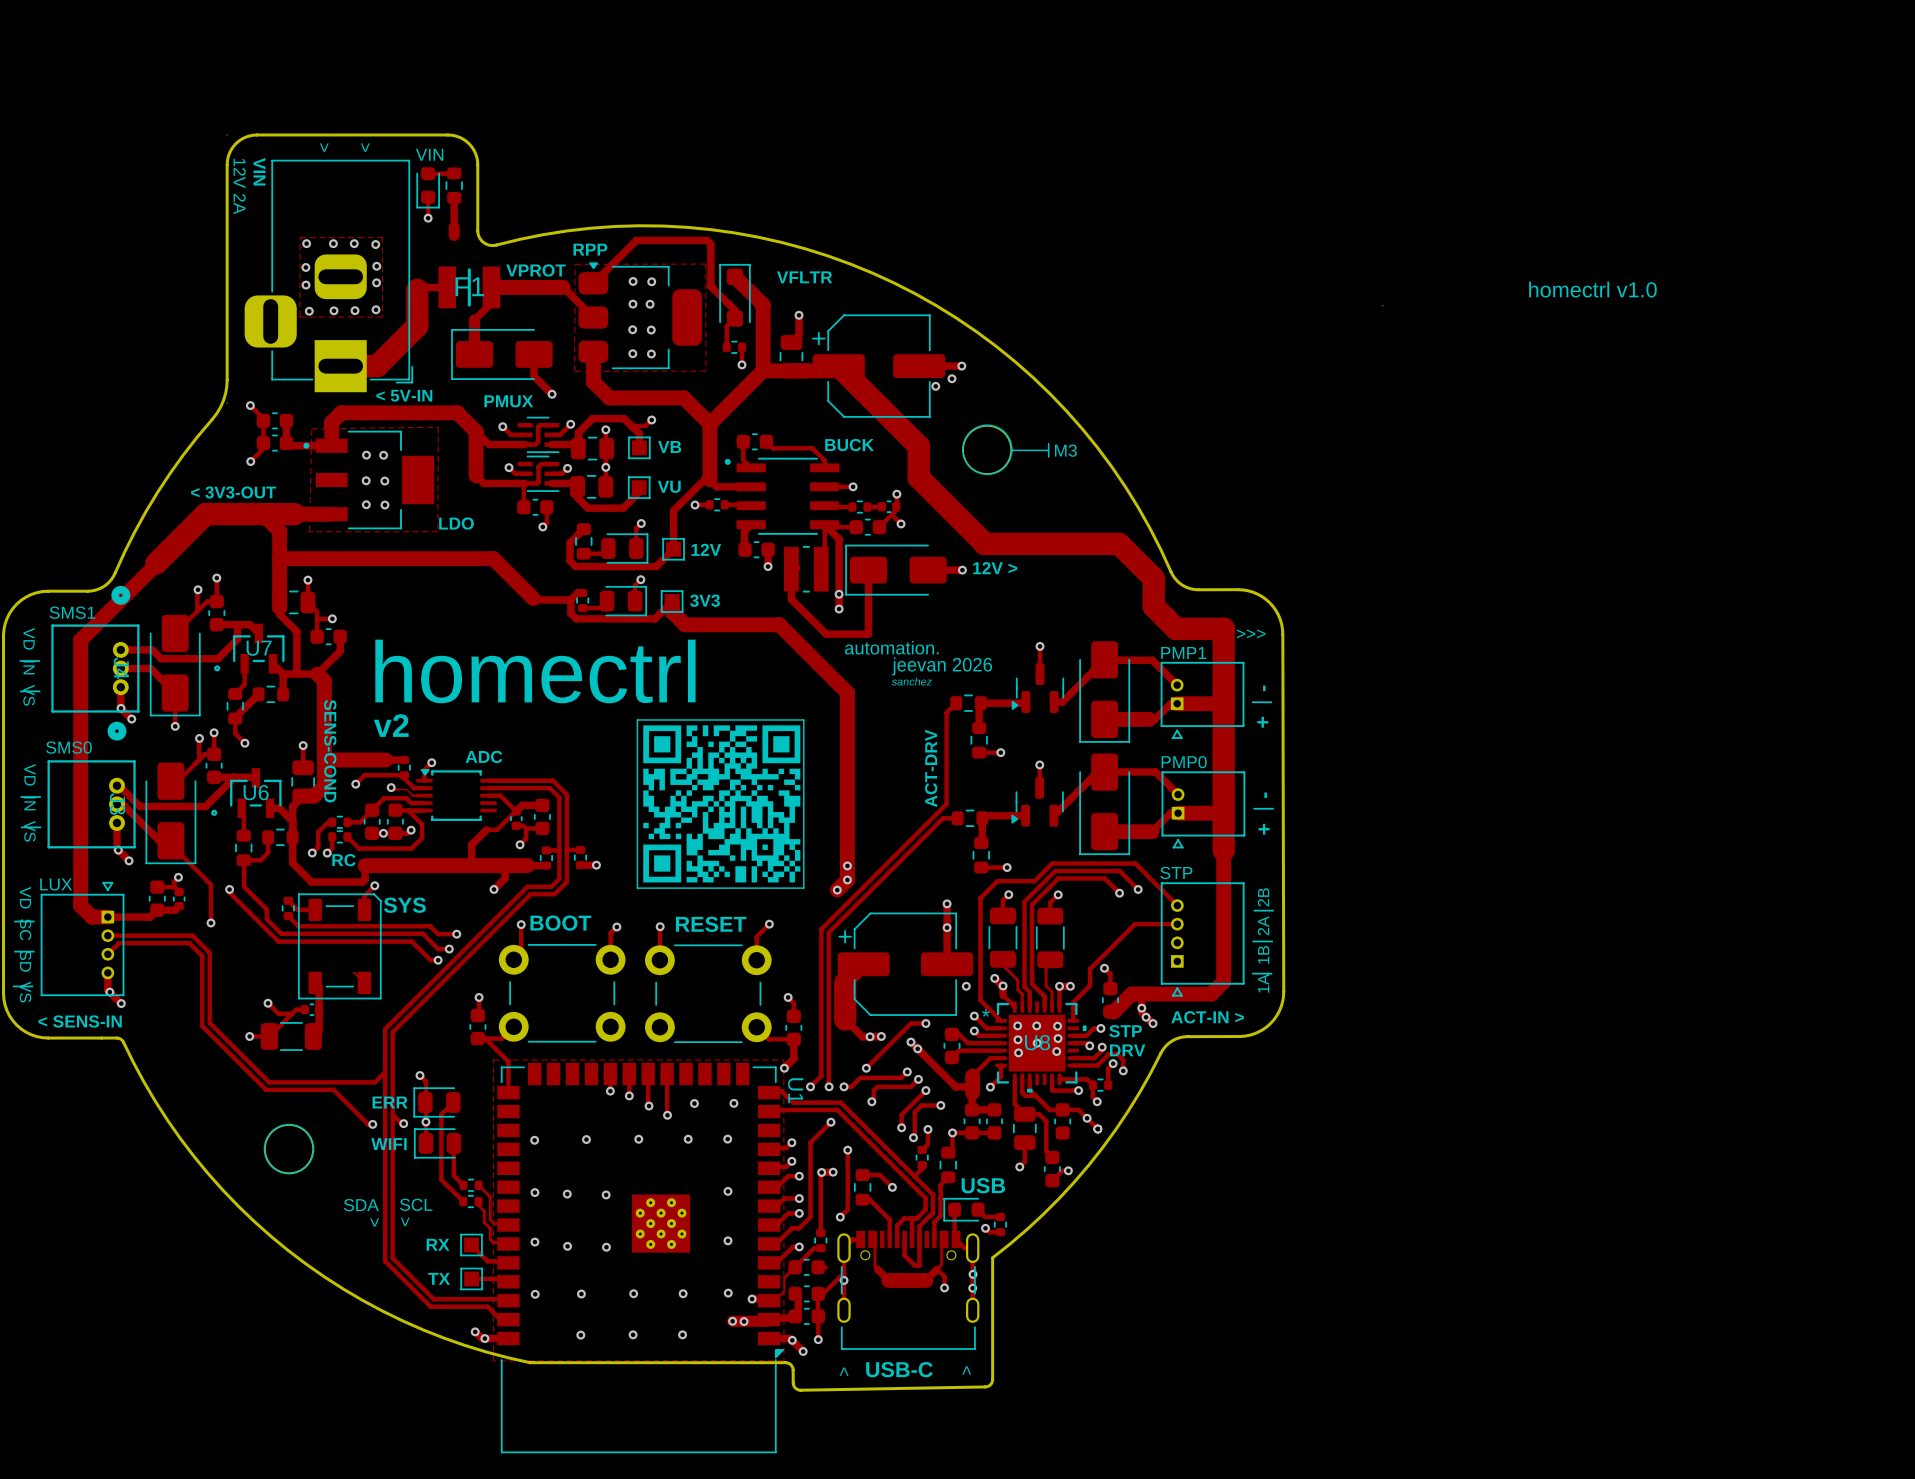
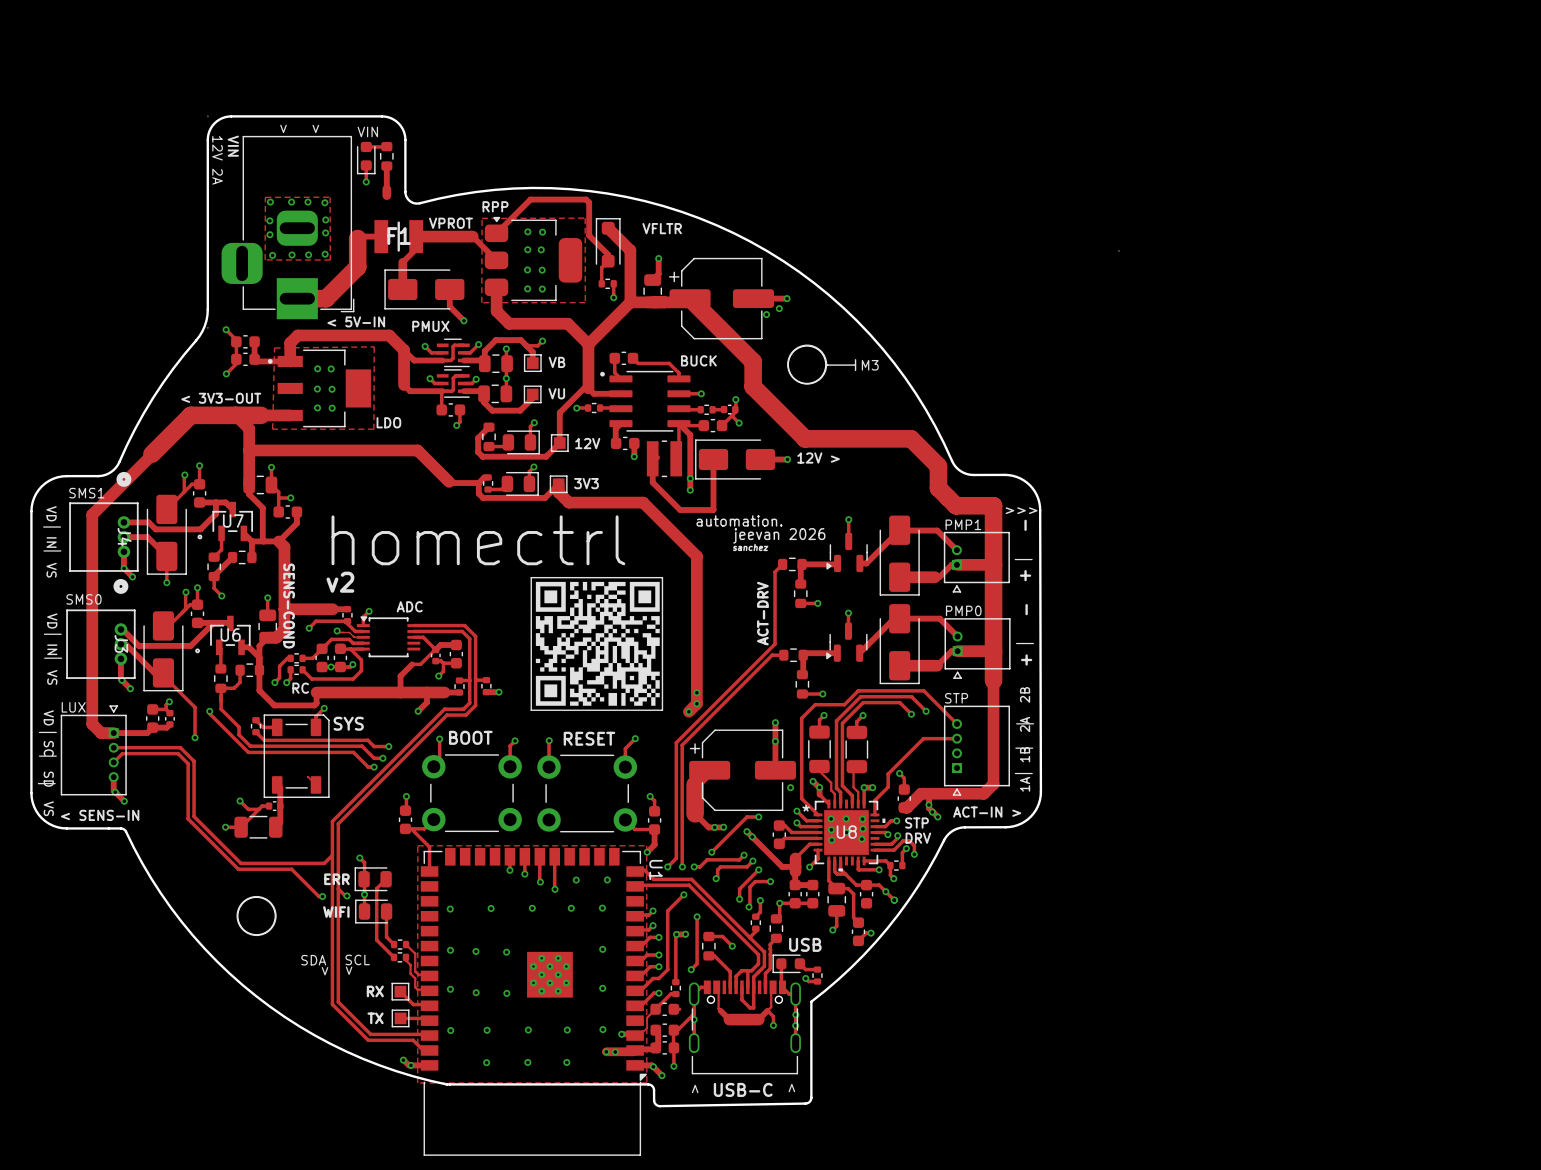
text: homectrl v1.0 (1592, 289) -> none

